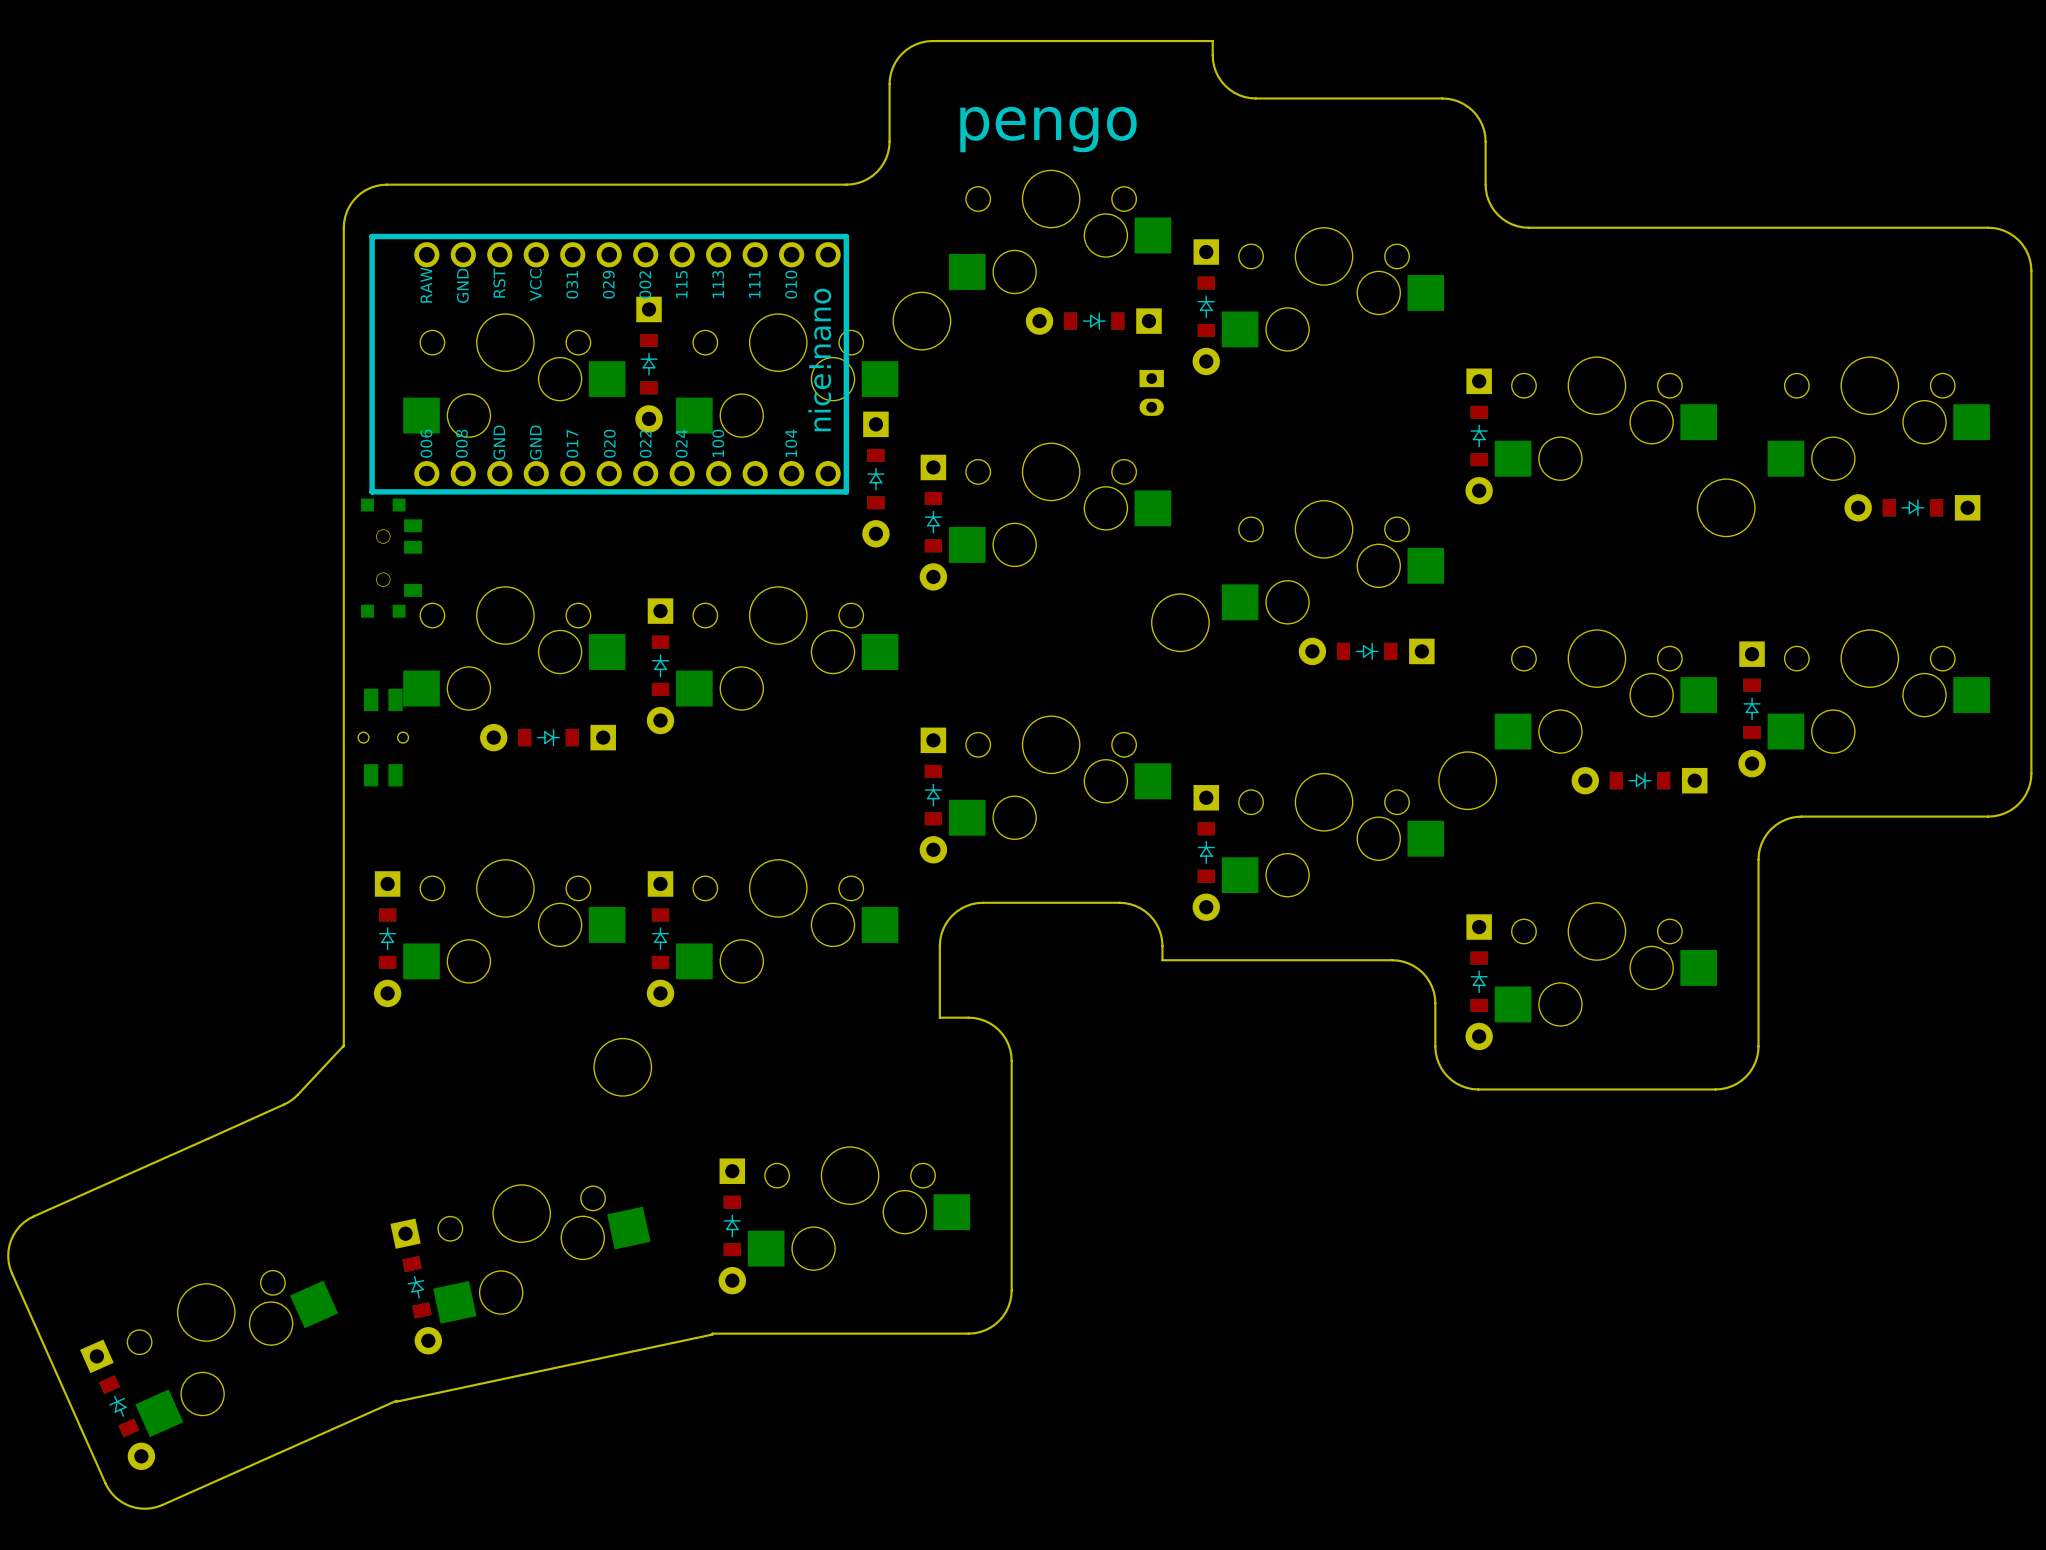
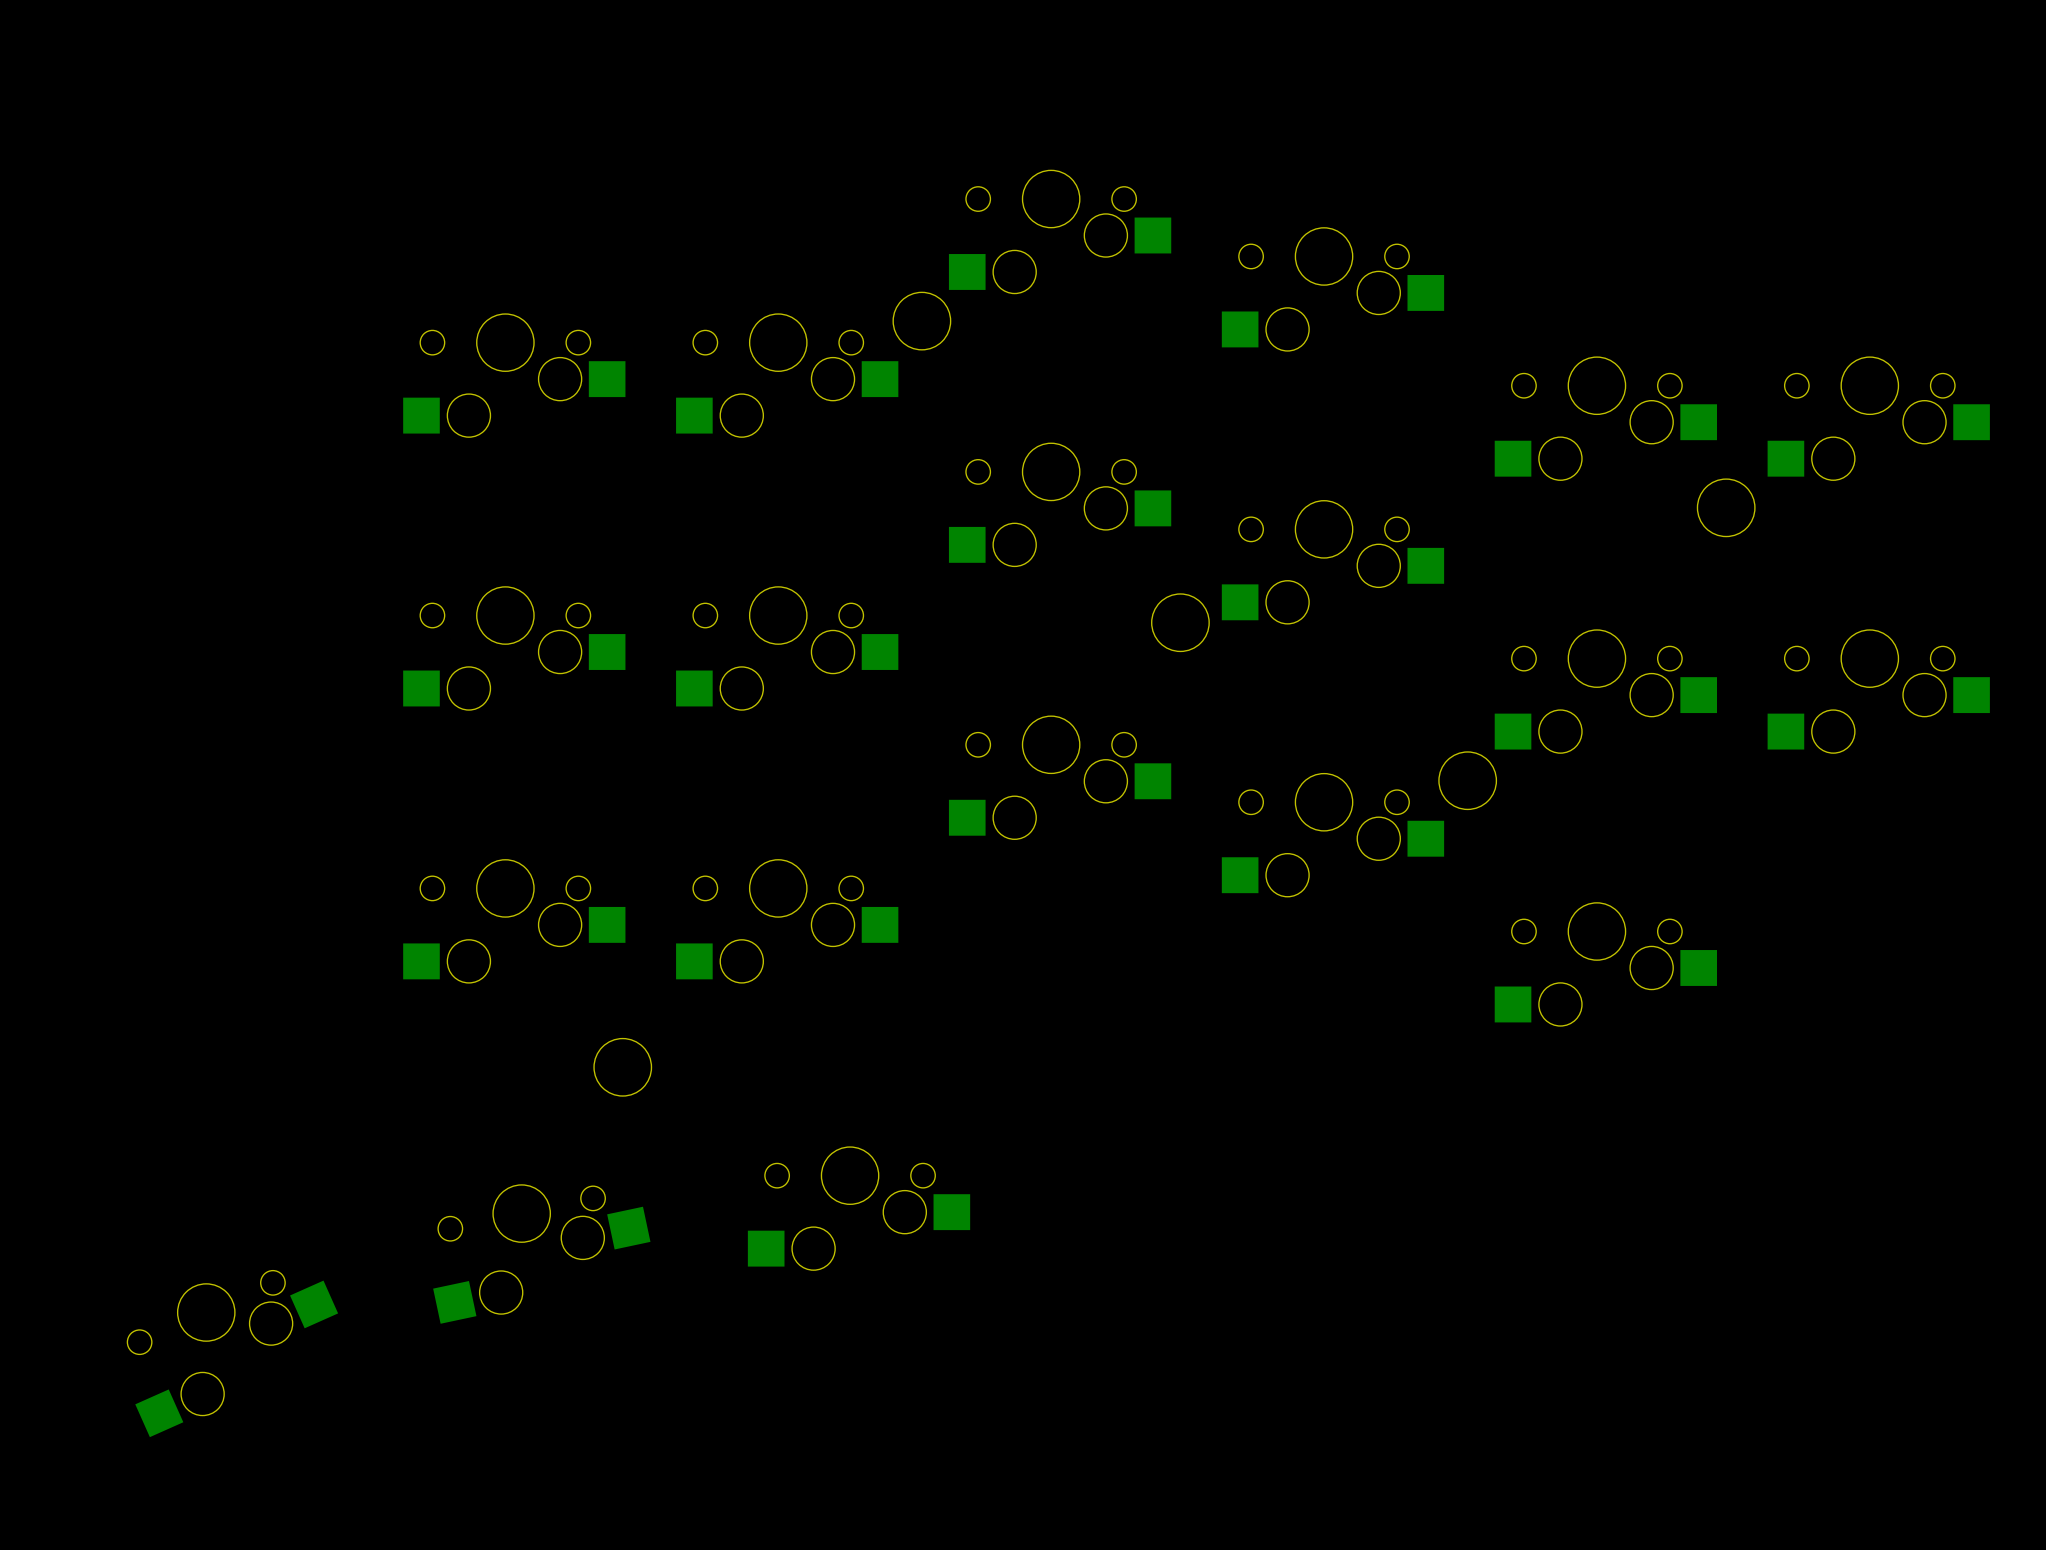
board edge: (932, 41) (1212, 41) (1213, 61) (1218, 76) (1229, 89) (1244, 97) (1453, 99) (1468, 107) (1482, 125) (1485, 141) (1485, 190) (1491, 206) (1502, 218) (1523, 227) (1988, 227) (1999, 229) (2014, 236) (2028, 254) (2031, 270) (2031, 773) (2025, 795) (2014, 807) (1993, 816) (1801, 816) (1785, 819) (1771, 829) (1761, 843) (1758, 859) (1758, 1052) (1755, 1062) (1745, 1076) (1731, 1086) (1721, 1089) (1467, 1088) (1452, 1080) (1438, 1062) (1435, 1052) (1433, 992) (1426, 977) (1408, 963) (1392, 960) (1162, 960) (1162, 940) (1156, 924) (1145, 911) (1130, 904) (982, 902) (966, 906) (948, 919) (941, 934) (939, 1017) (974, 1018) (990, 1023) (1002, 1034) (1011, 1055) (1011, 1290) (1008, 1307) (994, 1324) (979, 1332) (968, 1333) (712, 1333) (396, 1400) (162, 1505) (140, 1508) (124, 1503) (111, 1492) (105, 1483) (11, 1273) (8, 1256) (9, 1245) (16, 1230) (33, 1216) (288, 1102) (298, 1094) (343, 1046) (343, 227) (349, 206) (365, 190) (386, 184) (857, 183) (876, 172) (888, 152) (889, 78) (895, 62) (911, 46) (932, 41) -> none
text: pengo (1048, 129) -> none
part: (1206, 307) -> none
part: (1093, 321) -> none
part: (609, 364) -> none
part: (649, 364) -> none
part: (1151, 392) -> none
part: (1479, 436) -> none
part: (875, 479) -> none
part: (1912, 507) -> none
part: (933, 522) -> none
part: (391, 558) -> none
part: (1366, 651) -> none
part: (660, 666) -> none
part: (1752, 709) -> none
part: (383, 737) -> none
part: (548, 737) -> none
part: (1639, 780) -> none
part: (933, 795) -> none
part: (1206, 852) -> none
part: (387, 939) -> none
part: (660, 939) -> none
part: (1479, 982) -> none
part: (732, 1226) -> none
part: (416, 1286) -> none
part: (117, 1404) -> none

